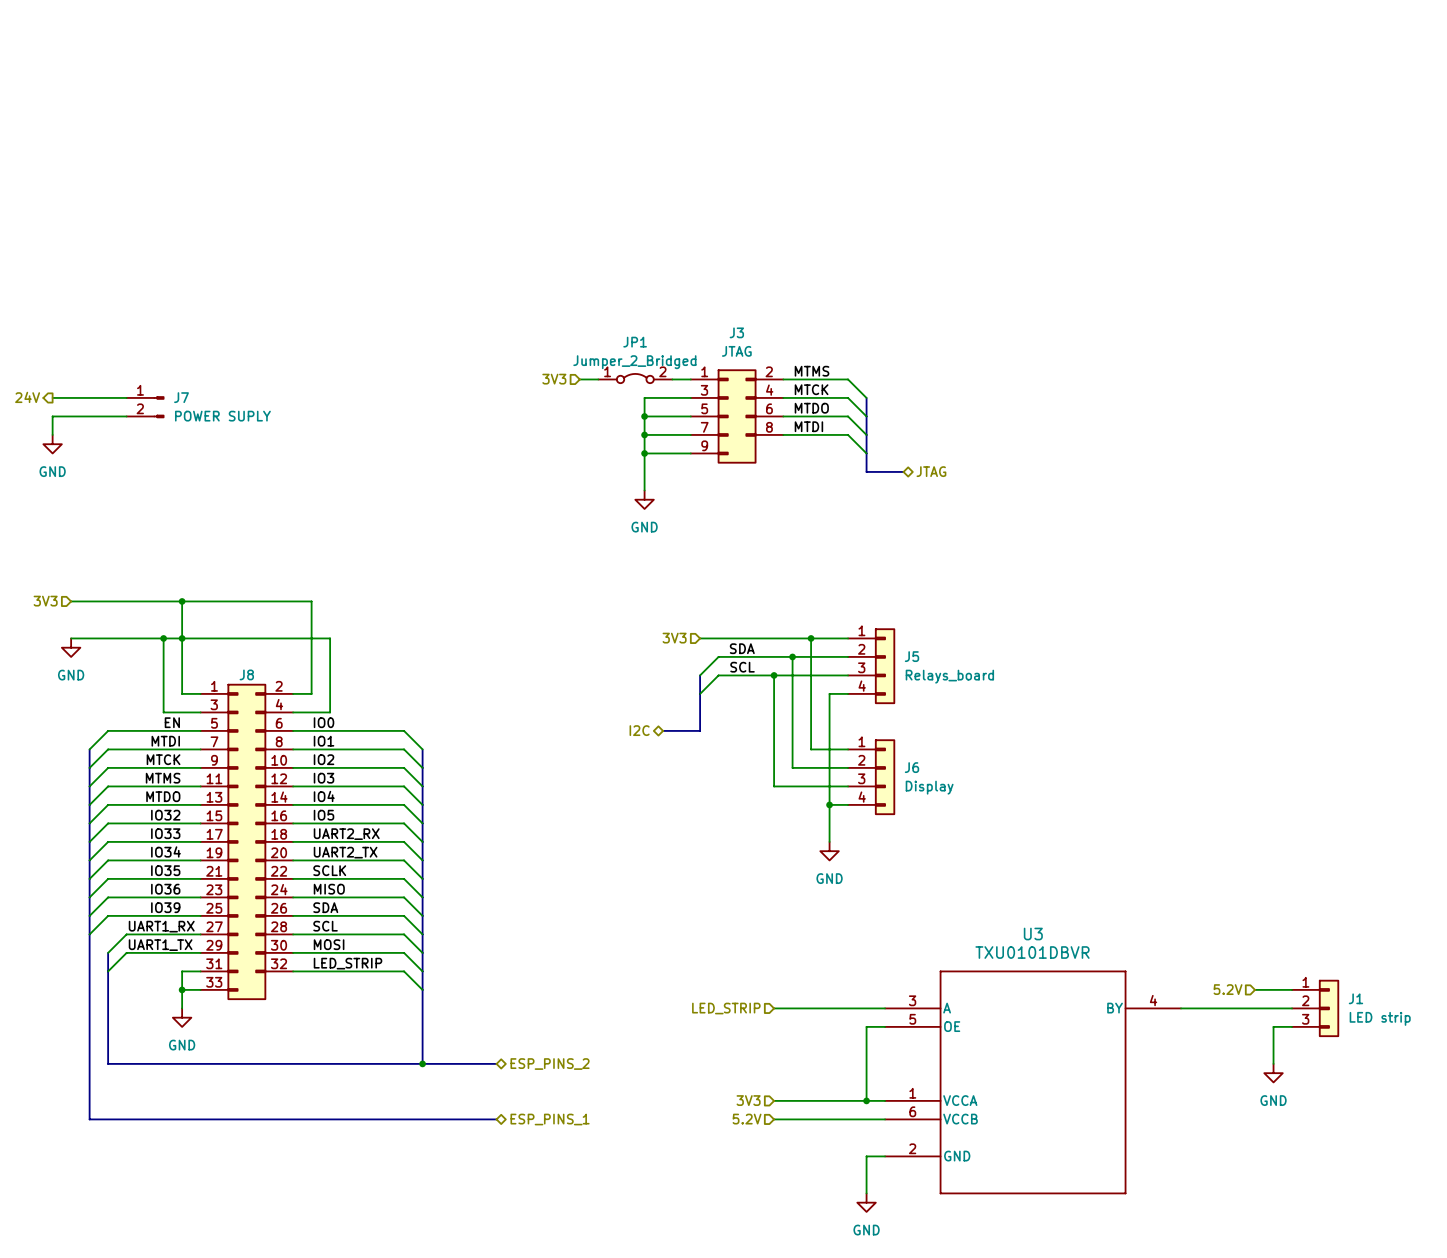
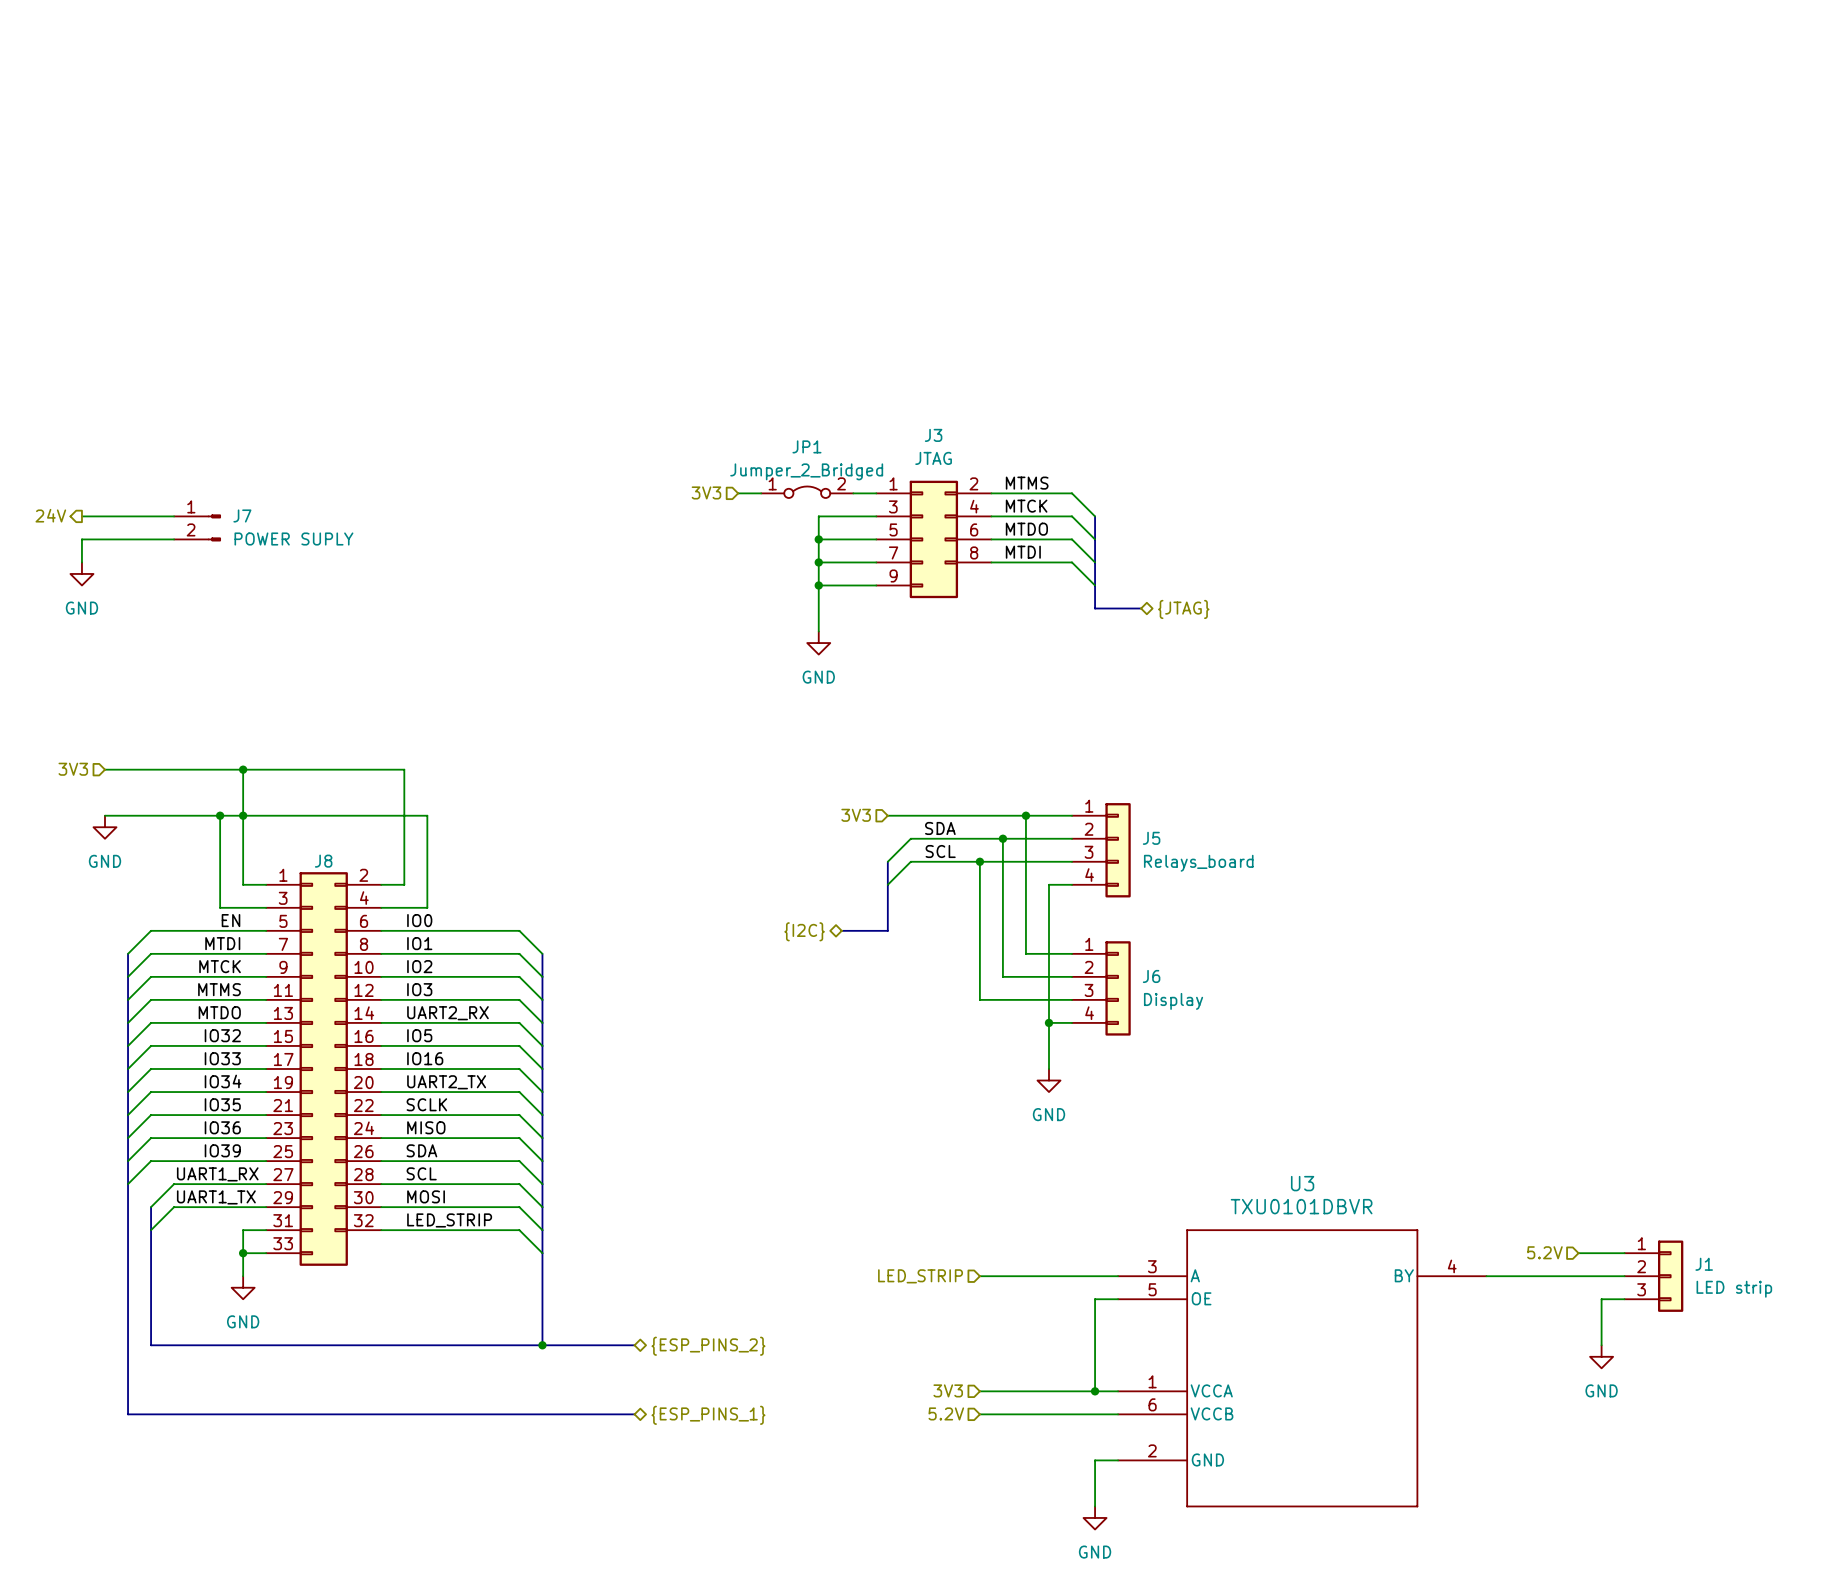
hierarchical label: JTAG (931, 471) -> {JTAG} (1183, 609)
hierarchical label: I2C (639, 730) -> {I2C} (804, 931)
label: IO4 (324, 796) -> UART2_RX (447, 1013)
label: UART2_RX (346, 834) -> IO16 (425, 1058)
hierarchical label: ESP_PINS_2 (550, 1064) -> {ESP_PINS_2} (708, 1346)
hierarchical label: ESP_PINS_1 (550, 1119) -> {ESP_PINS_1} (708, 1415)

